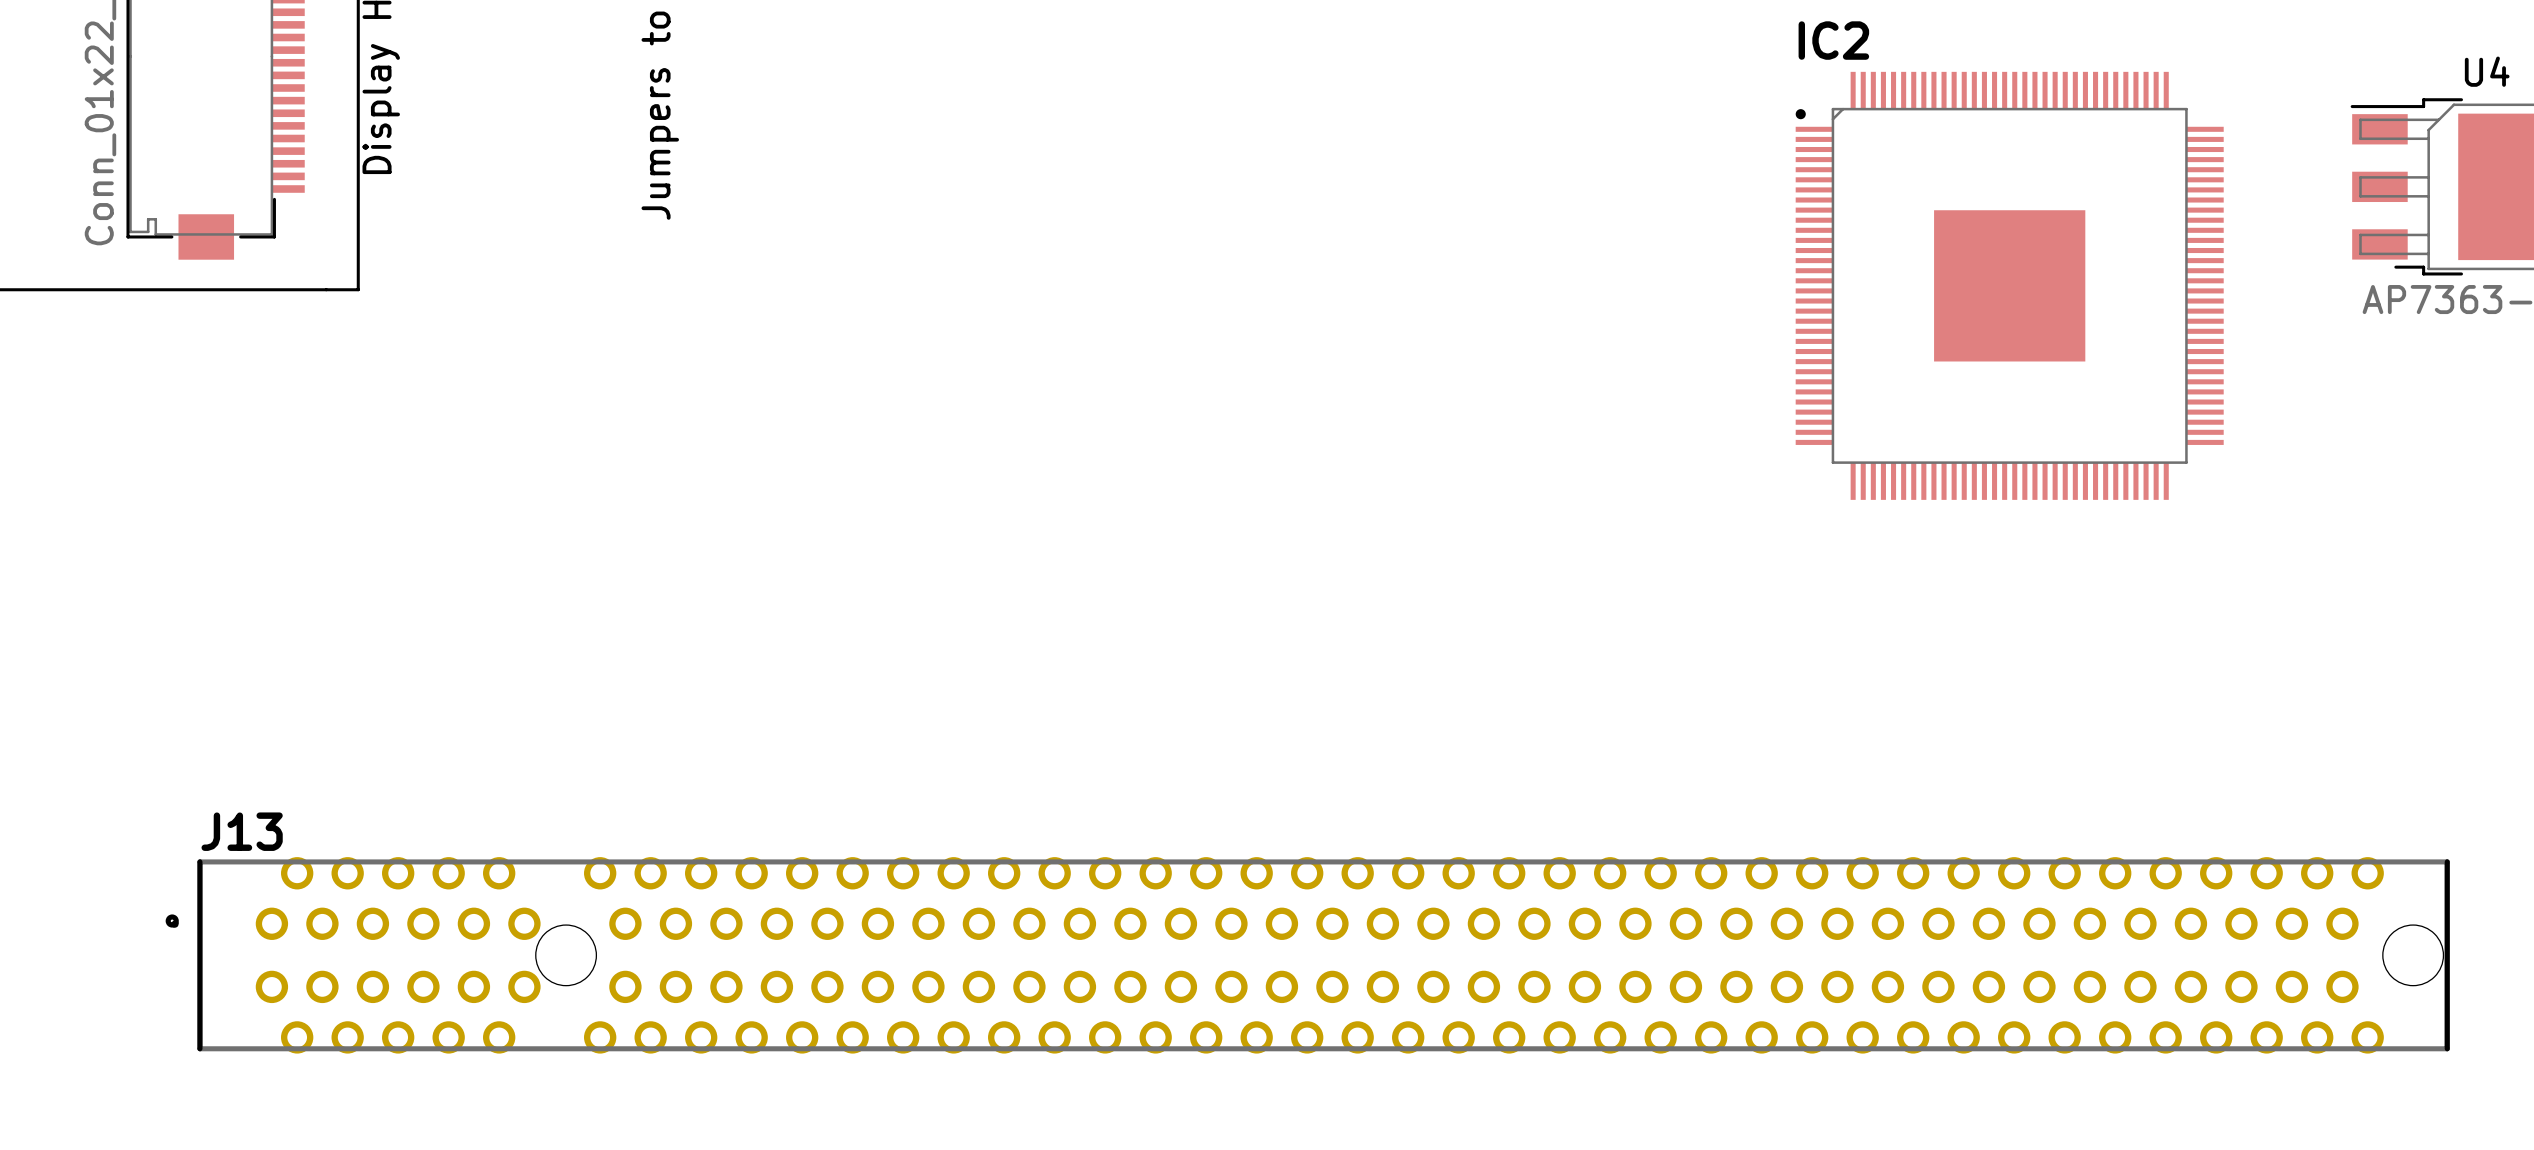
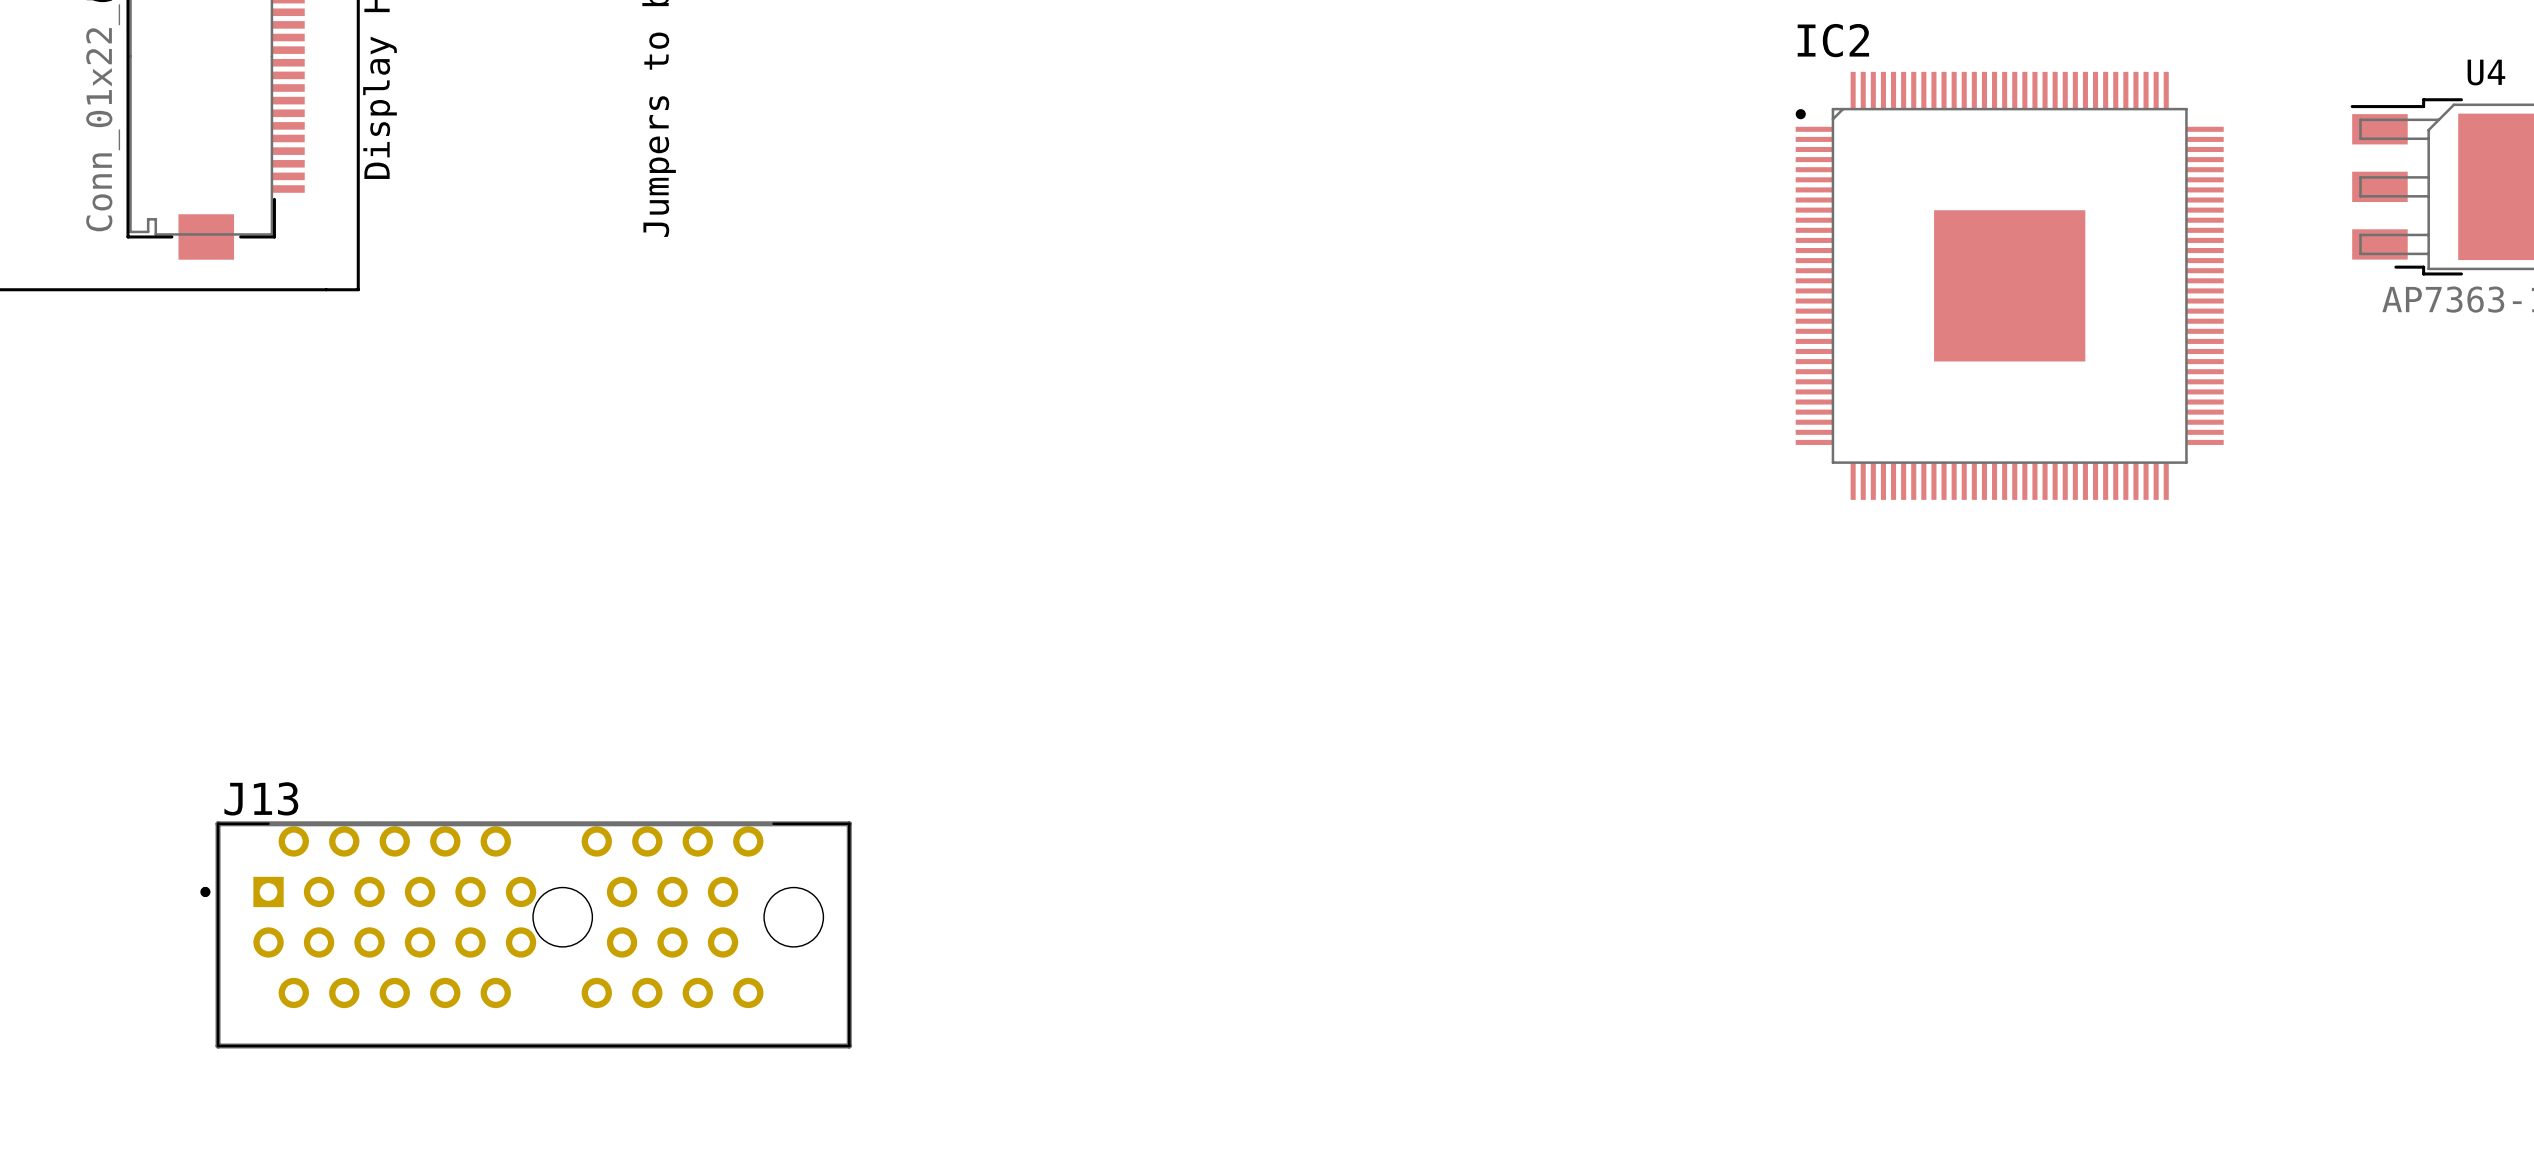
J13 name position: J13 (242, 831) -> J13 (261, 798)
J13 footprint: [165, 857, 2450, 1054] -> [200, 821, 852, 1049]

